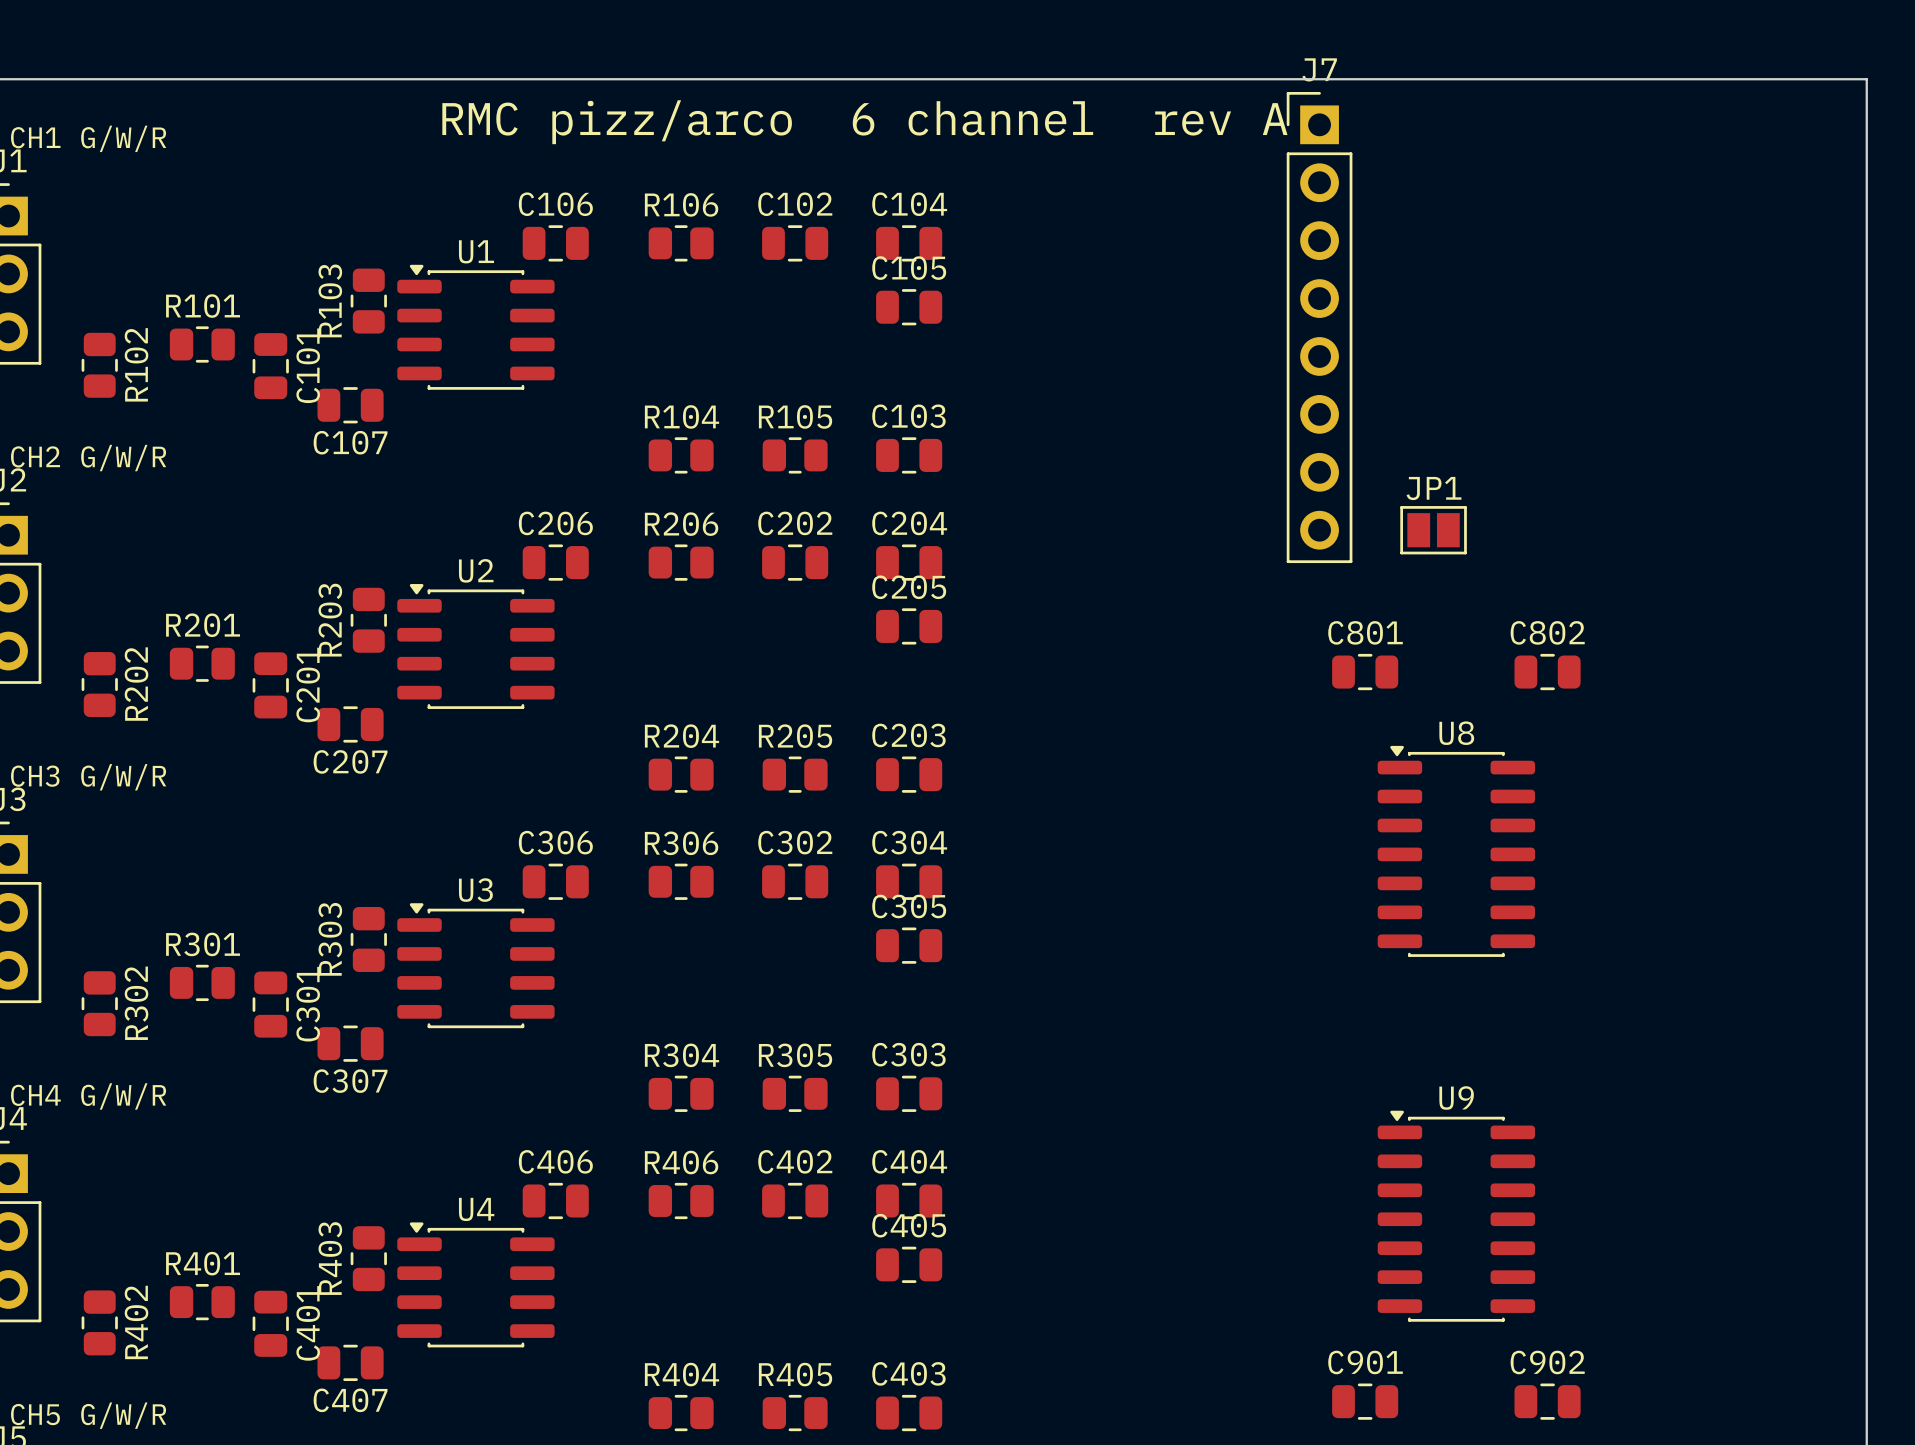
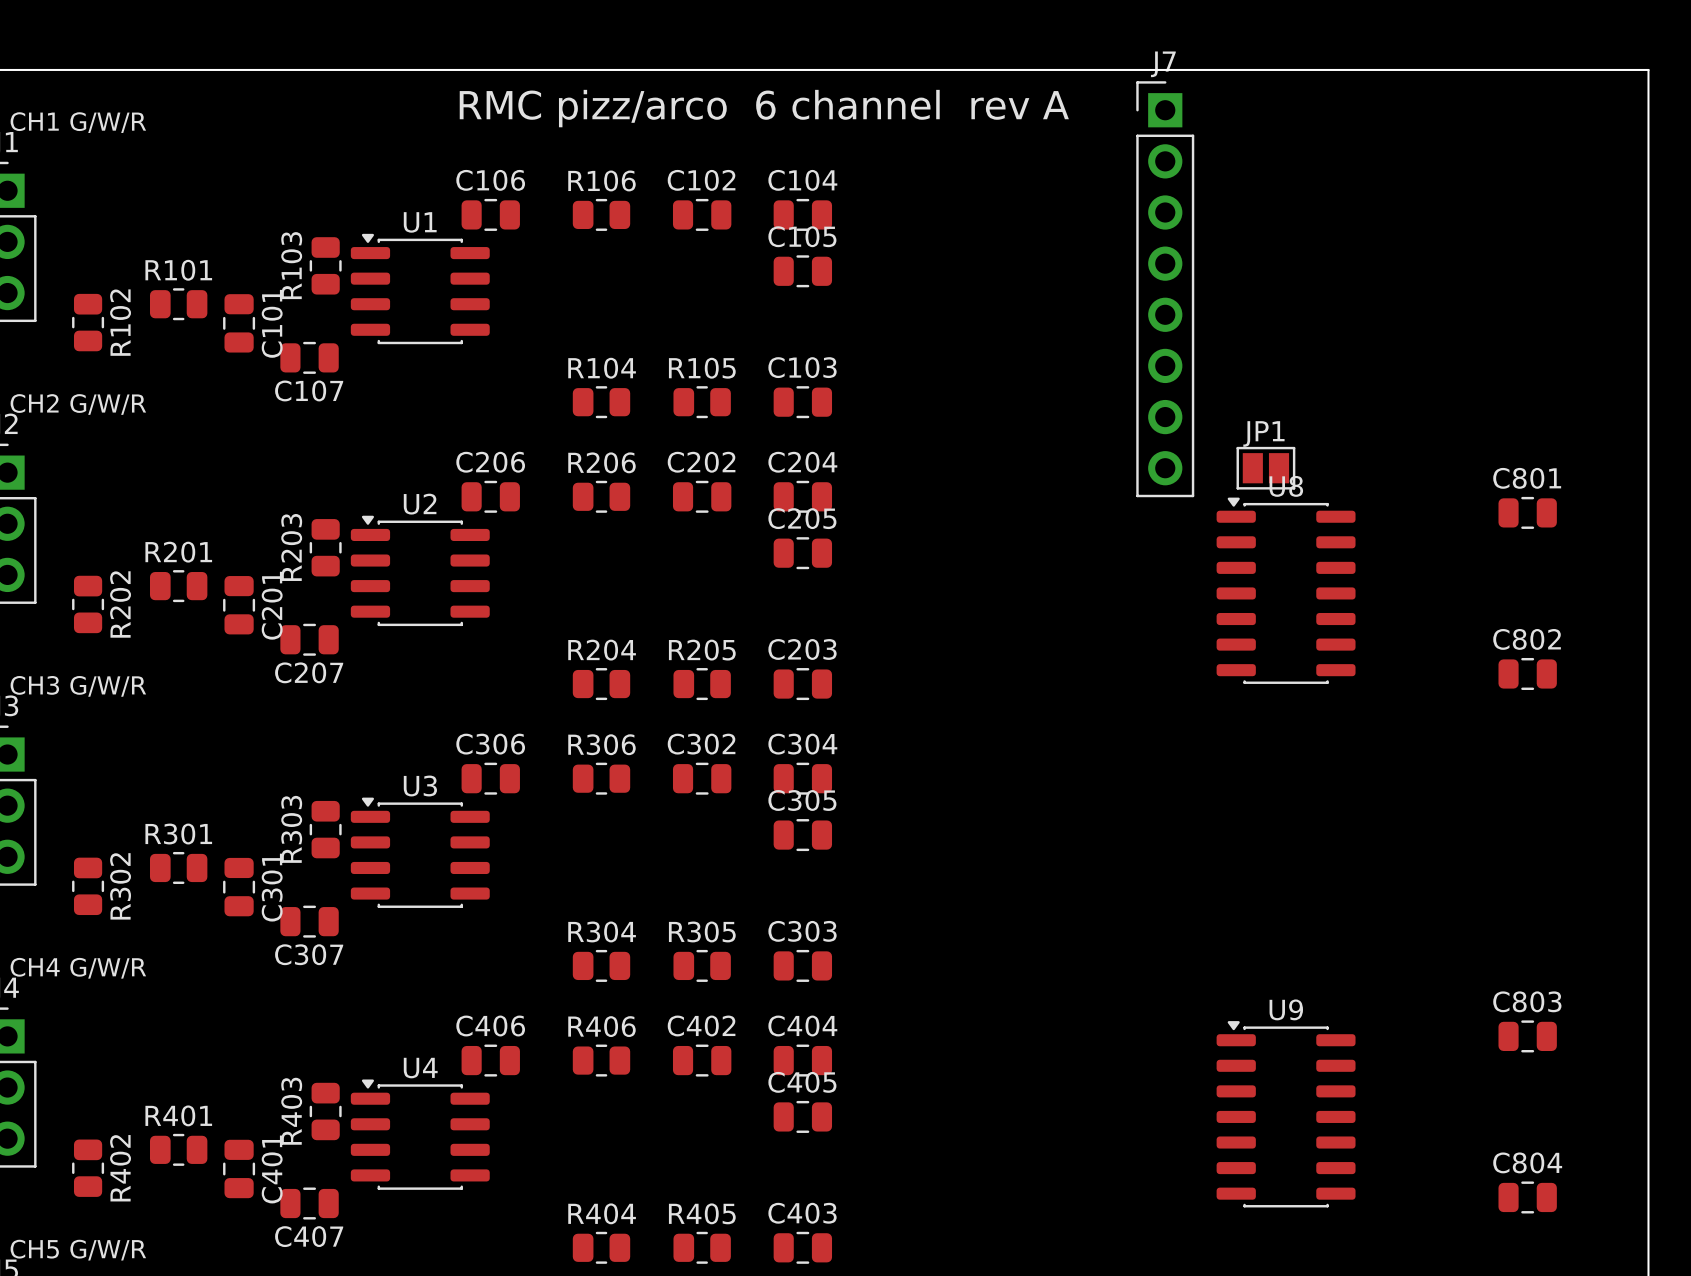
C801 position: (1365, 672) -> (1527, 512)
C802 position: (1547, 672) -> (1527, 673)
U8 position: (1456, 851) -> (1286, 590)
C803: none -> (1527, 1036)
U9 position: (1456, 1216) -> (1286, 1114)
C804: none -> (1527, 1197)
C901: (1365, 1401) -> none
C902: (1547, 1401) -> none

